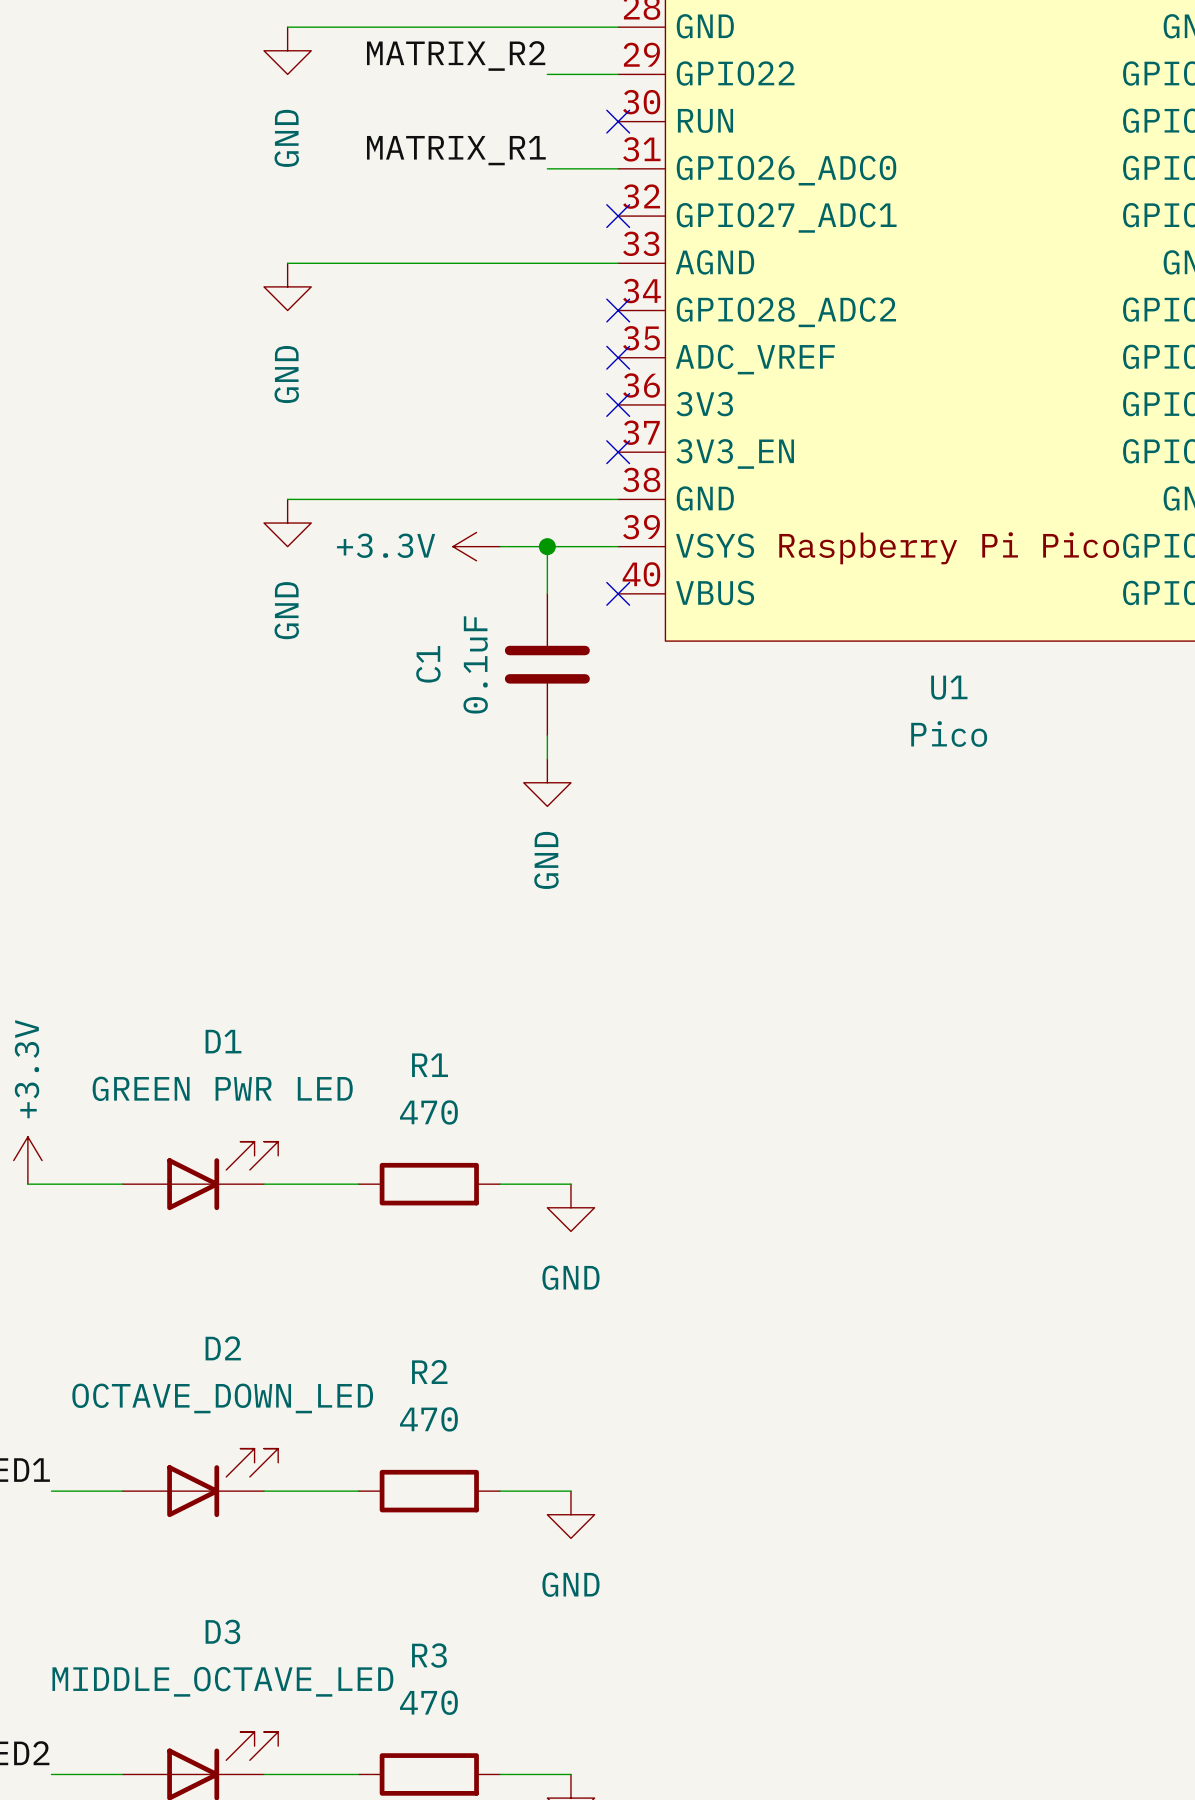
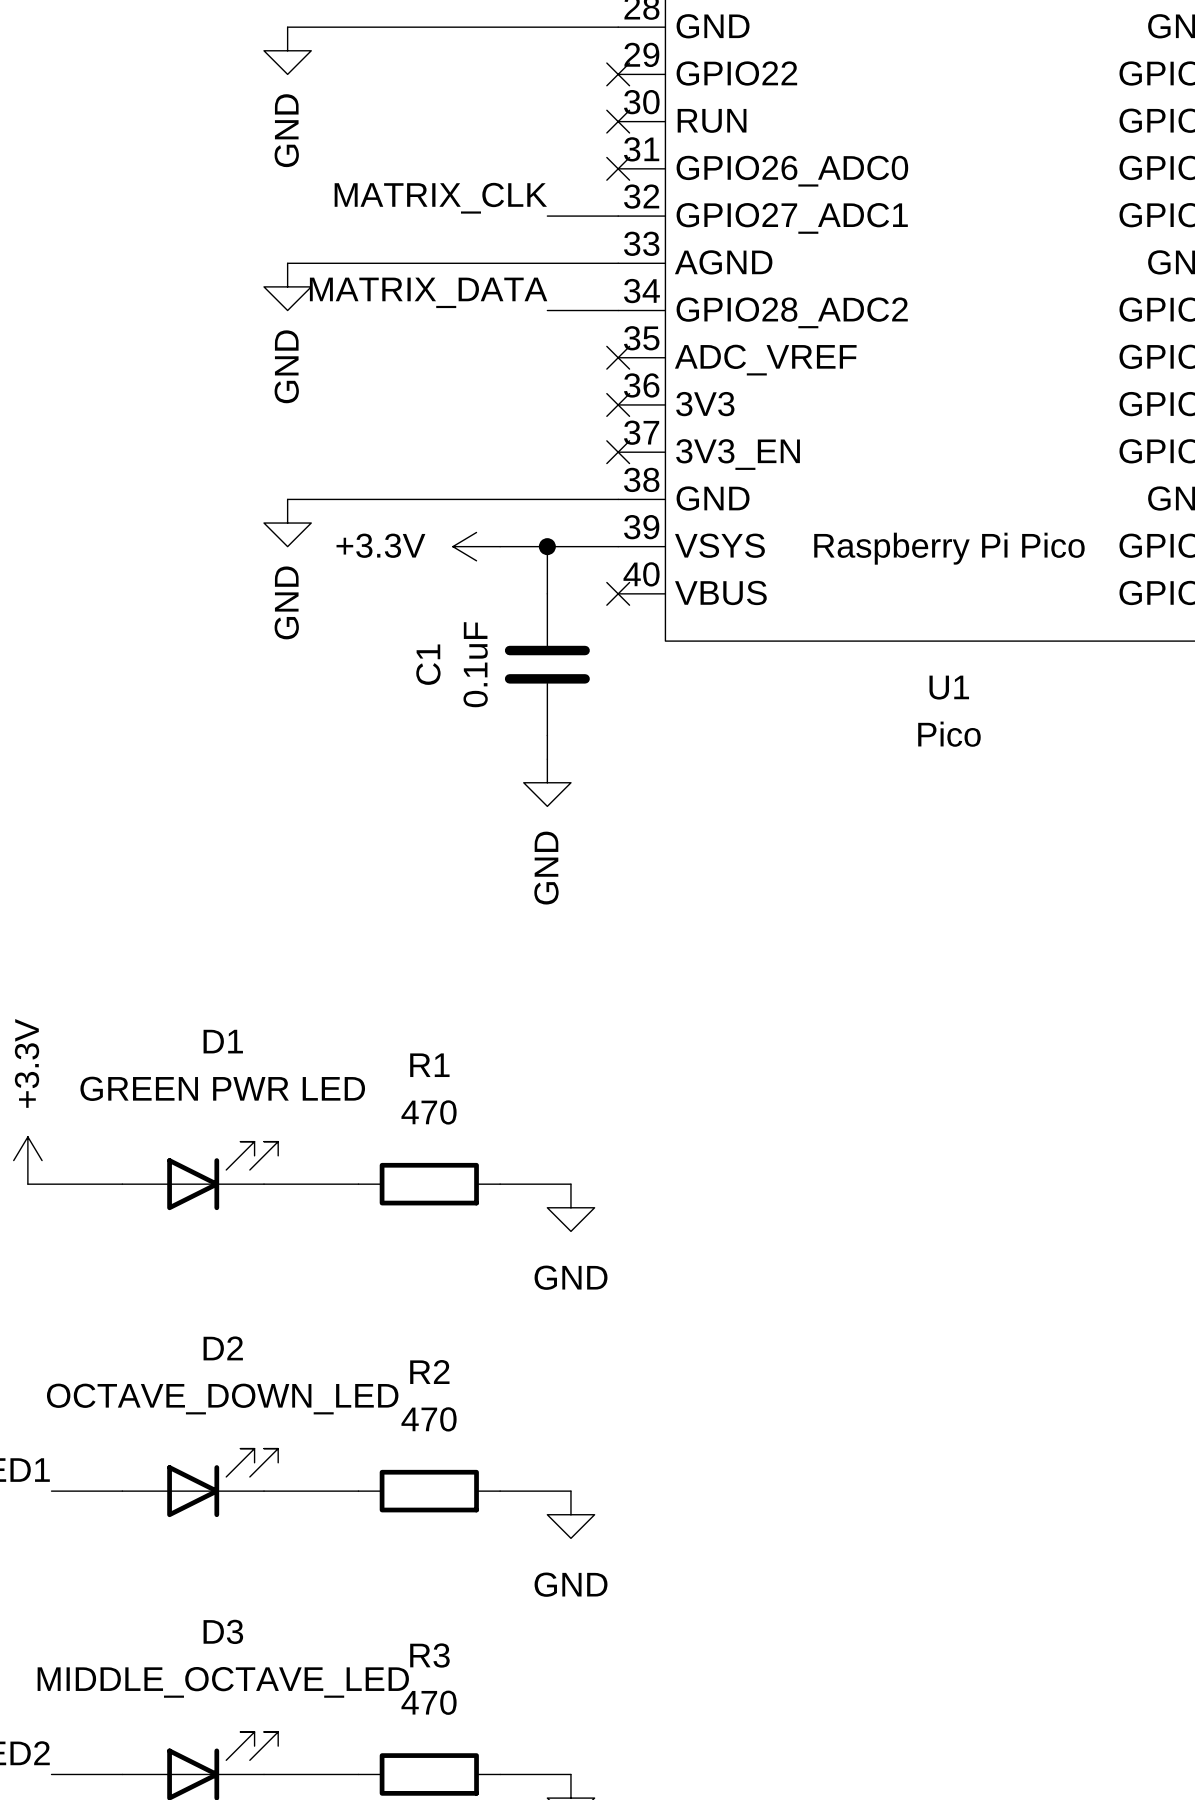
label: MATRIX_R2 (456, 55) -> none
wire: (547, 74) (618, 74) -> (547, 310) (618, 310)
no-connect mark: none -> (618, 74)
label: MATRIX_R1 (456, 150) -> MATRIX_CLK (440, 198)
wire: (547, 168) (618, 168) -> (547, 216) (618, 216)
no-connect mark position: (618, 216) -> (618, 168)
label: none -> MATRIX_DATA (428, 292)
no-connect mark: (618, 310) -> none

